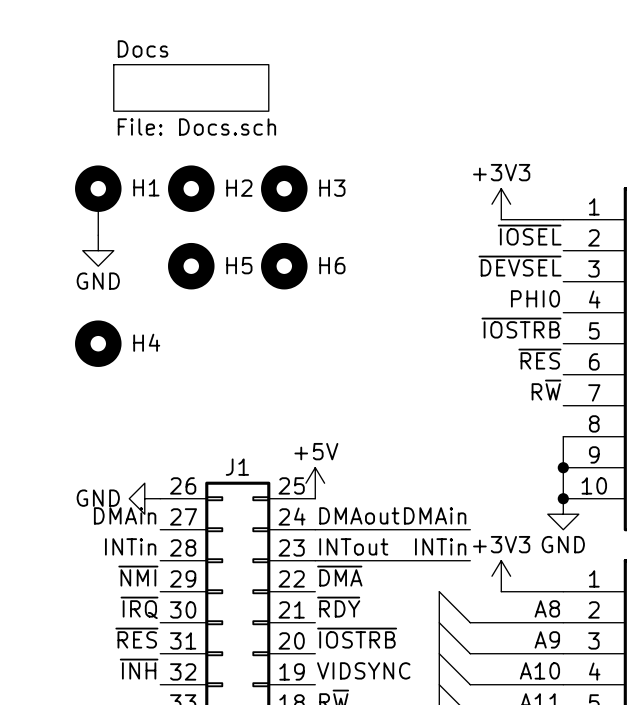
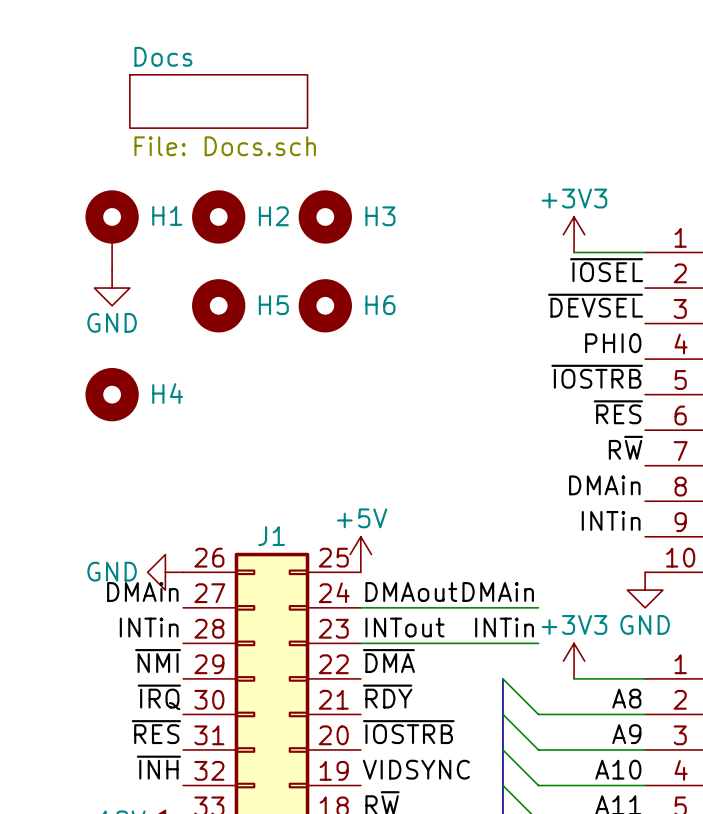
label: none -> DMAin (604, 485)
wire: (563, 436) (563, 498) -> none
label: none -> INTin (611, 520)
junction: (563, 467) -> none
junction: (563, 498) -> none

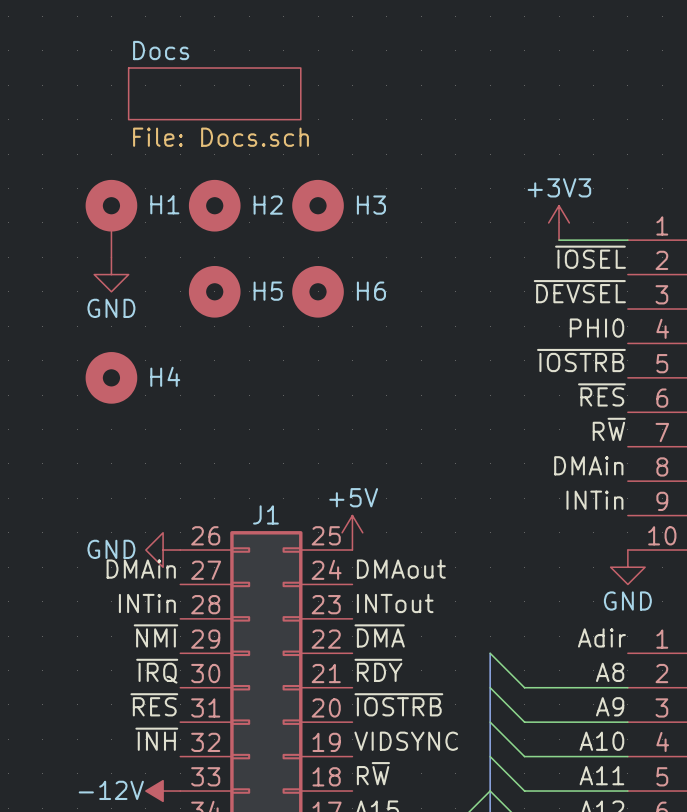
label: DMAin (498, 591) -> none
wire: (360, 607) (538, 607) -> none
label: INTin (504, 627) -> none
wire: (360, 643) (538, 643) -> none
power symbol: +3V3 (574, 661) -> none
label: none -> Adir (601, 637)
wire: (574, 678) (645, 678) -> none

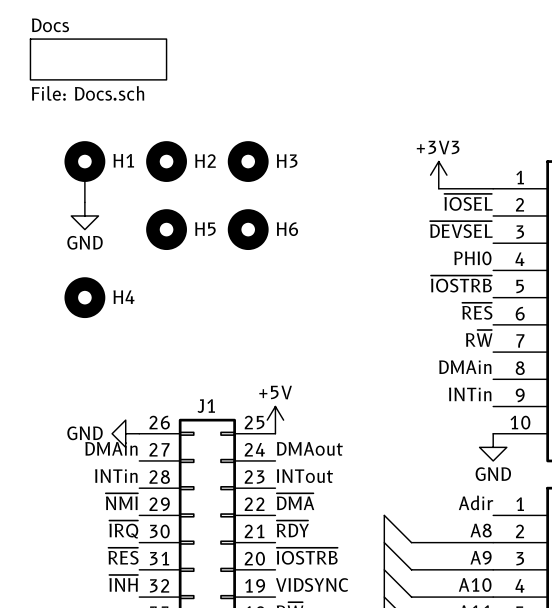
sheet Docs position: (214, 93) -> (98, 59)

